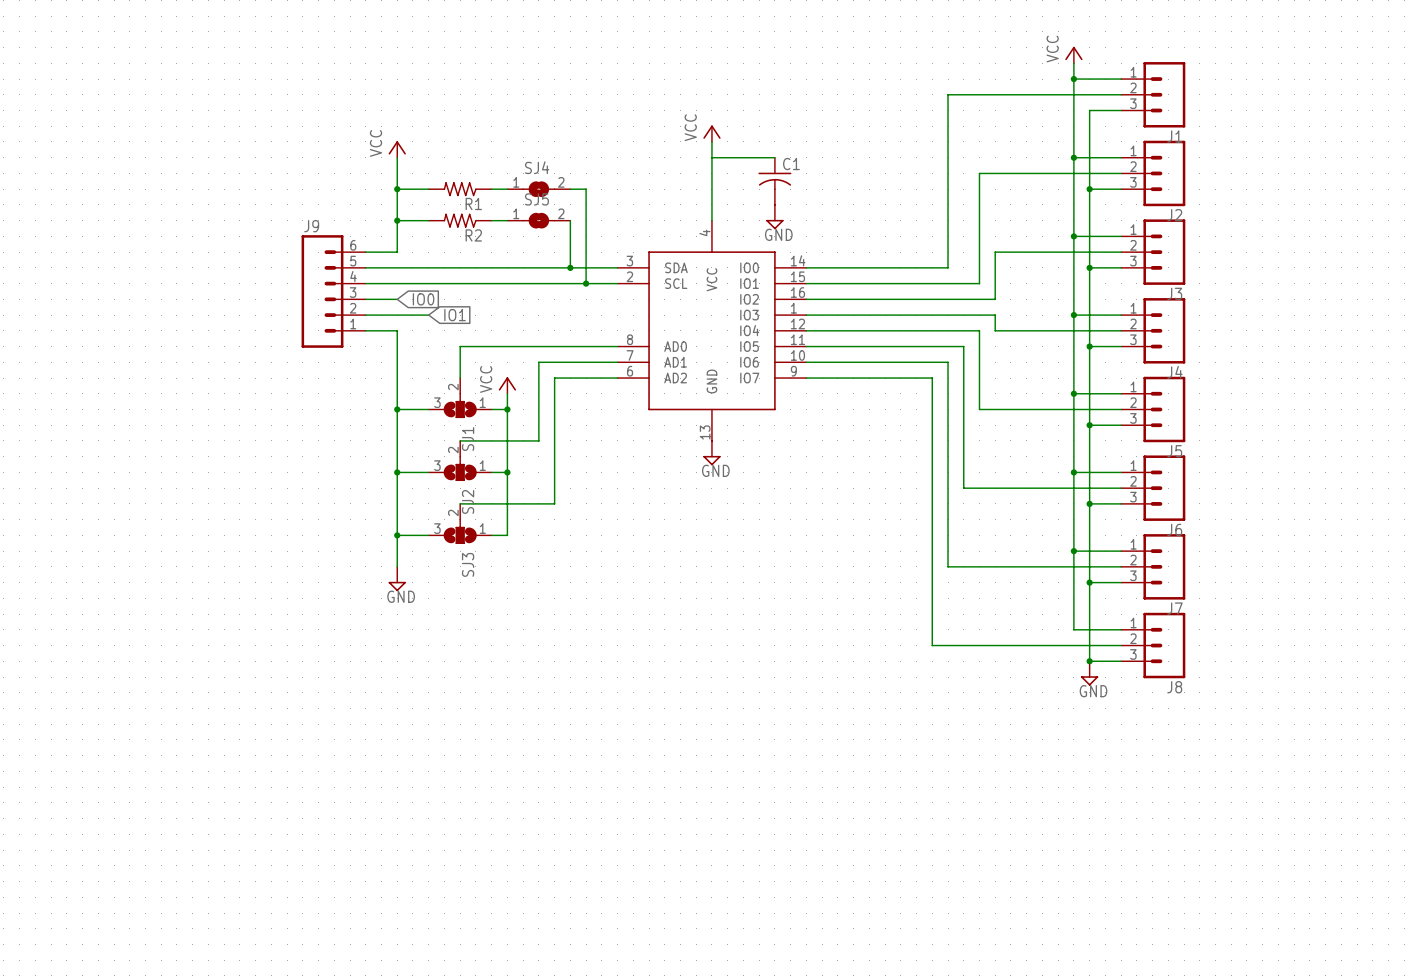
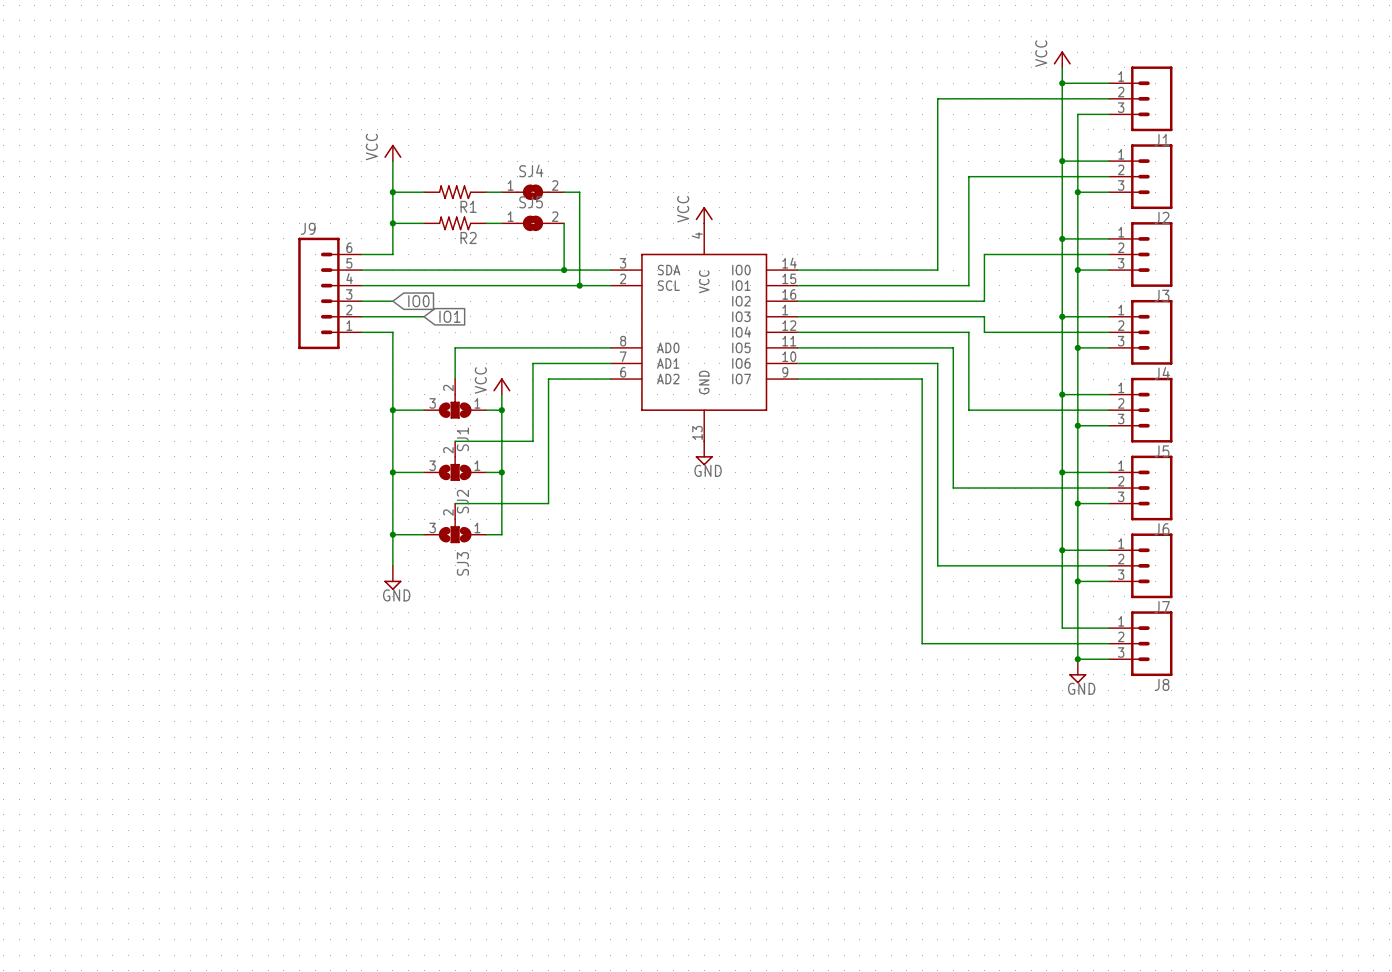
power symbol position: VCC (711, 133) -> VCC (704, 215)
wire: (711, 141) (711, 220) -> none
wire: (711, 157) (774, 157) -> none
C1: (774, 181) -> none
power symbol: GND (774, 217) -> none

